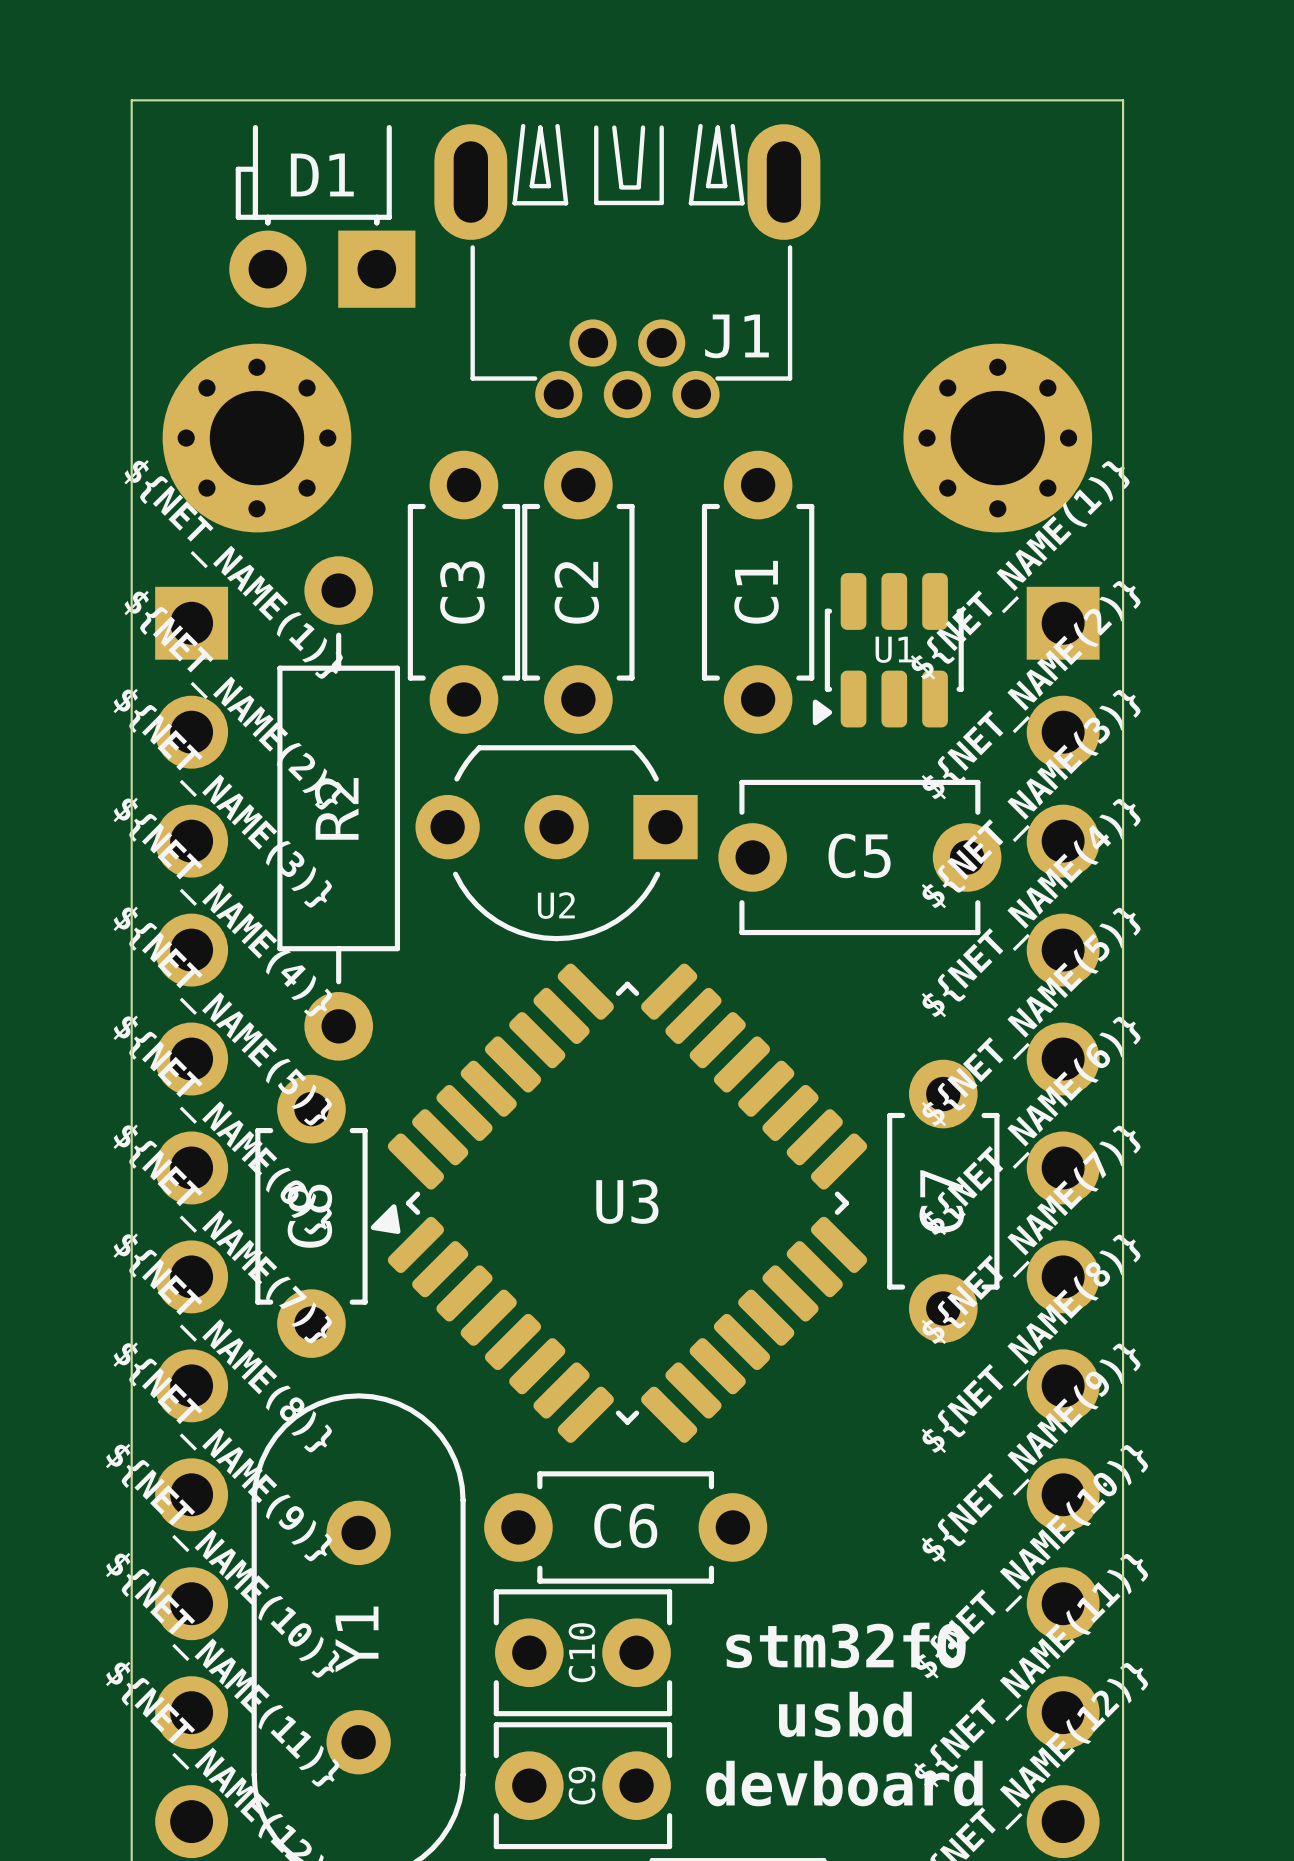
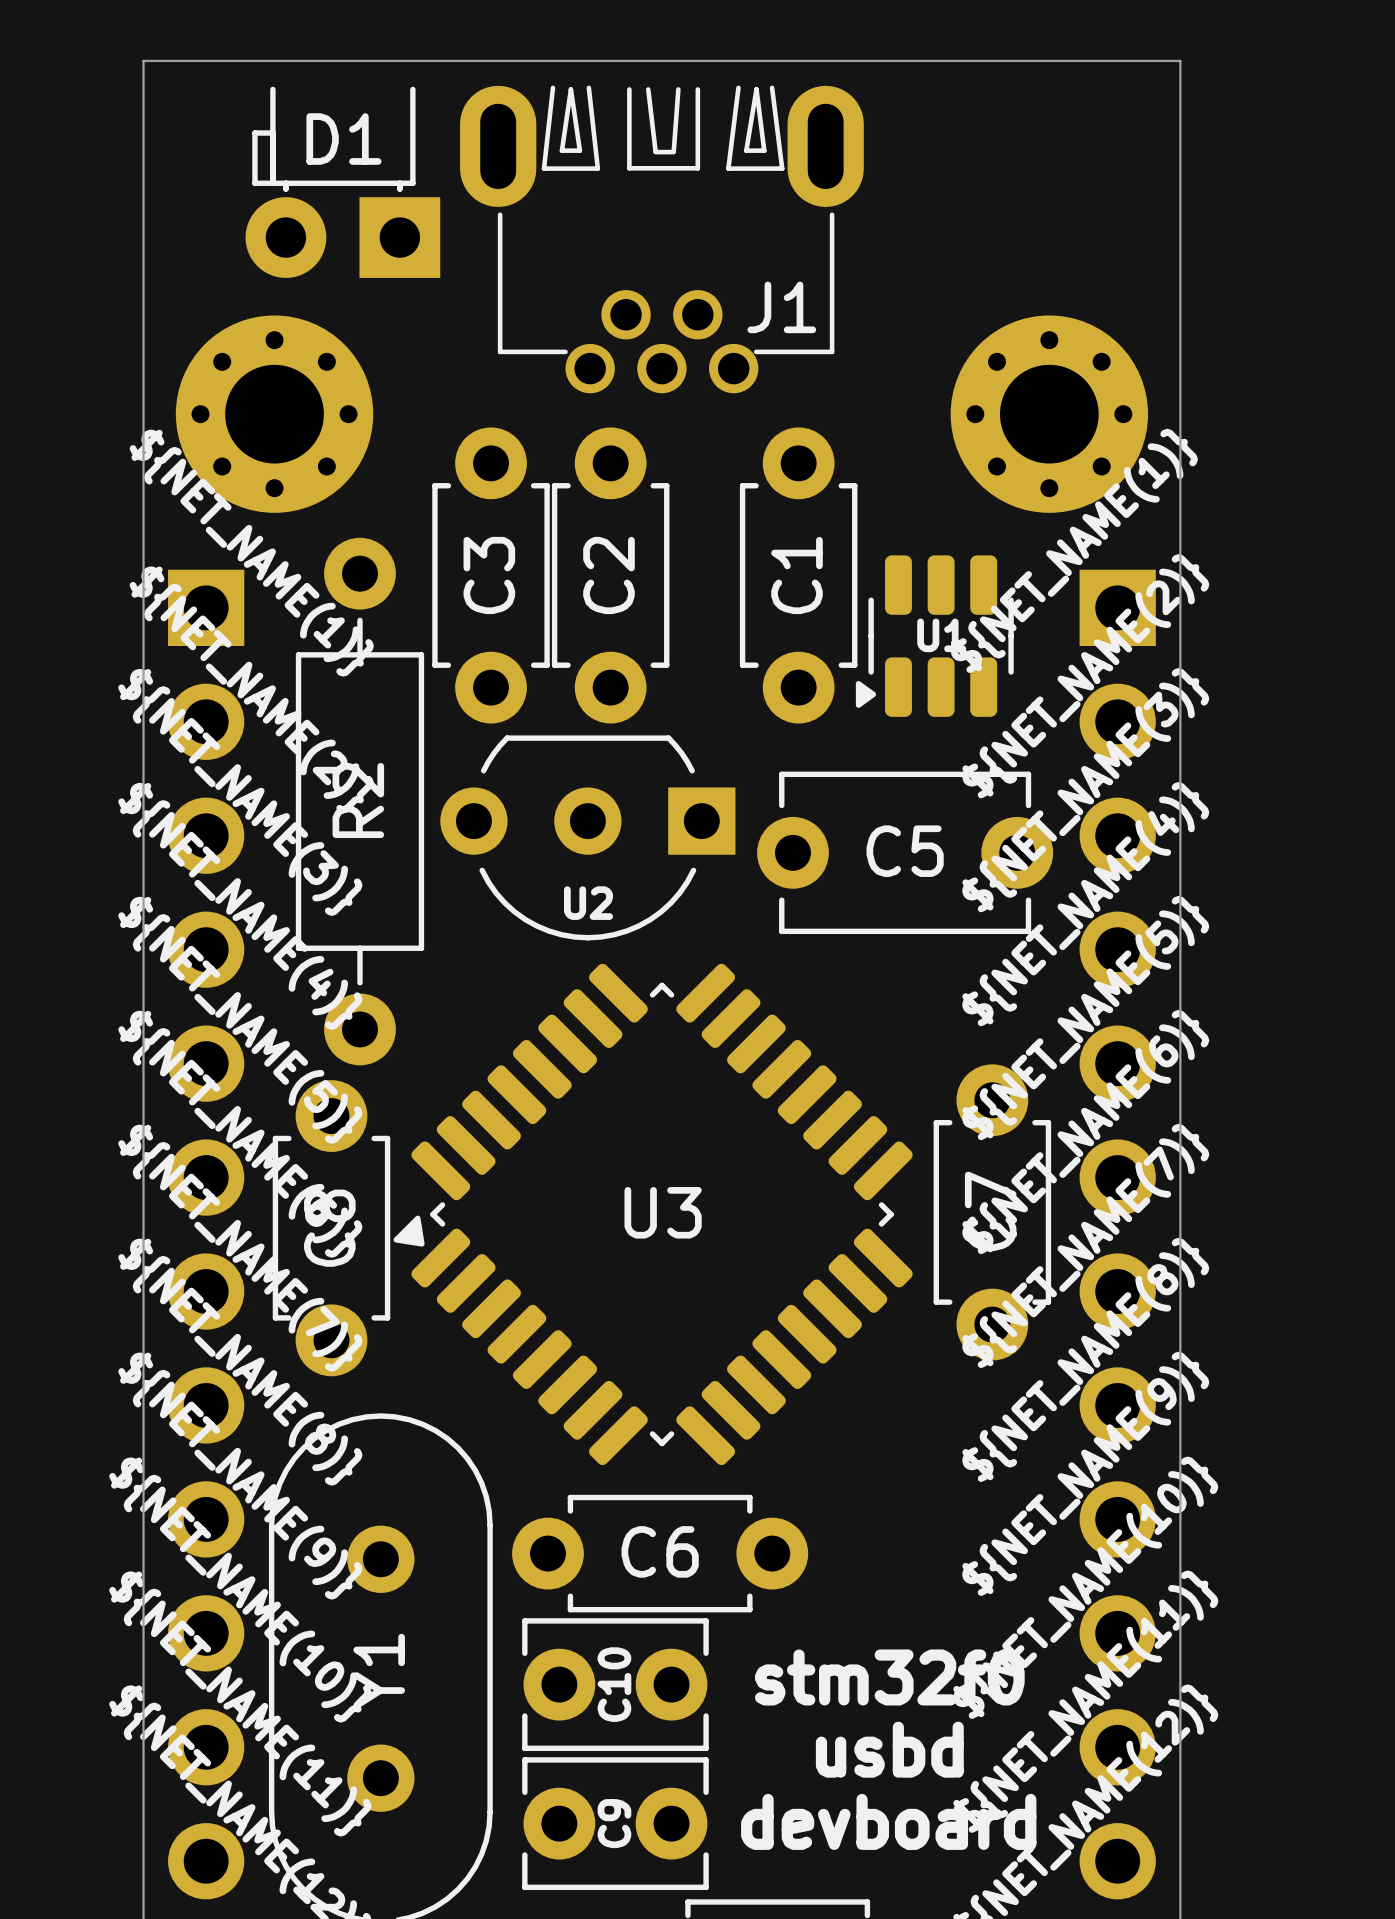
U1 footprint: [812, 573, 964, 728] -> [855, 555, 1014, 717]

